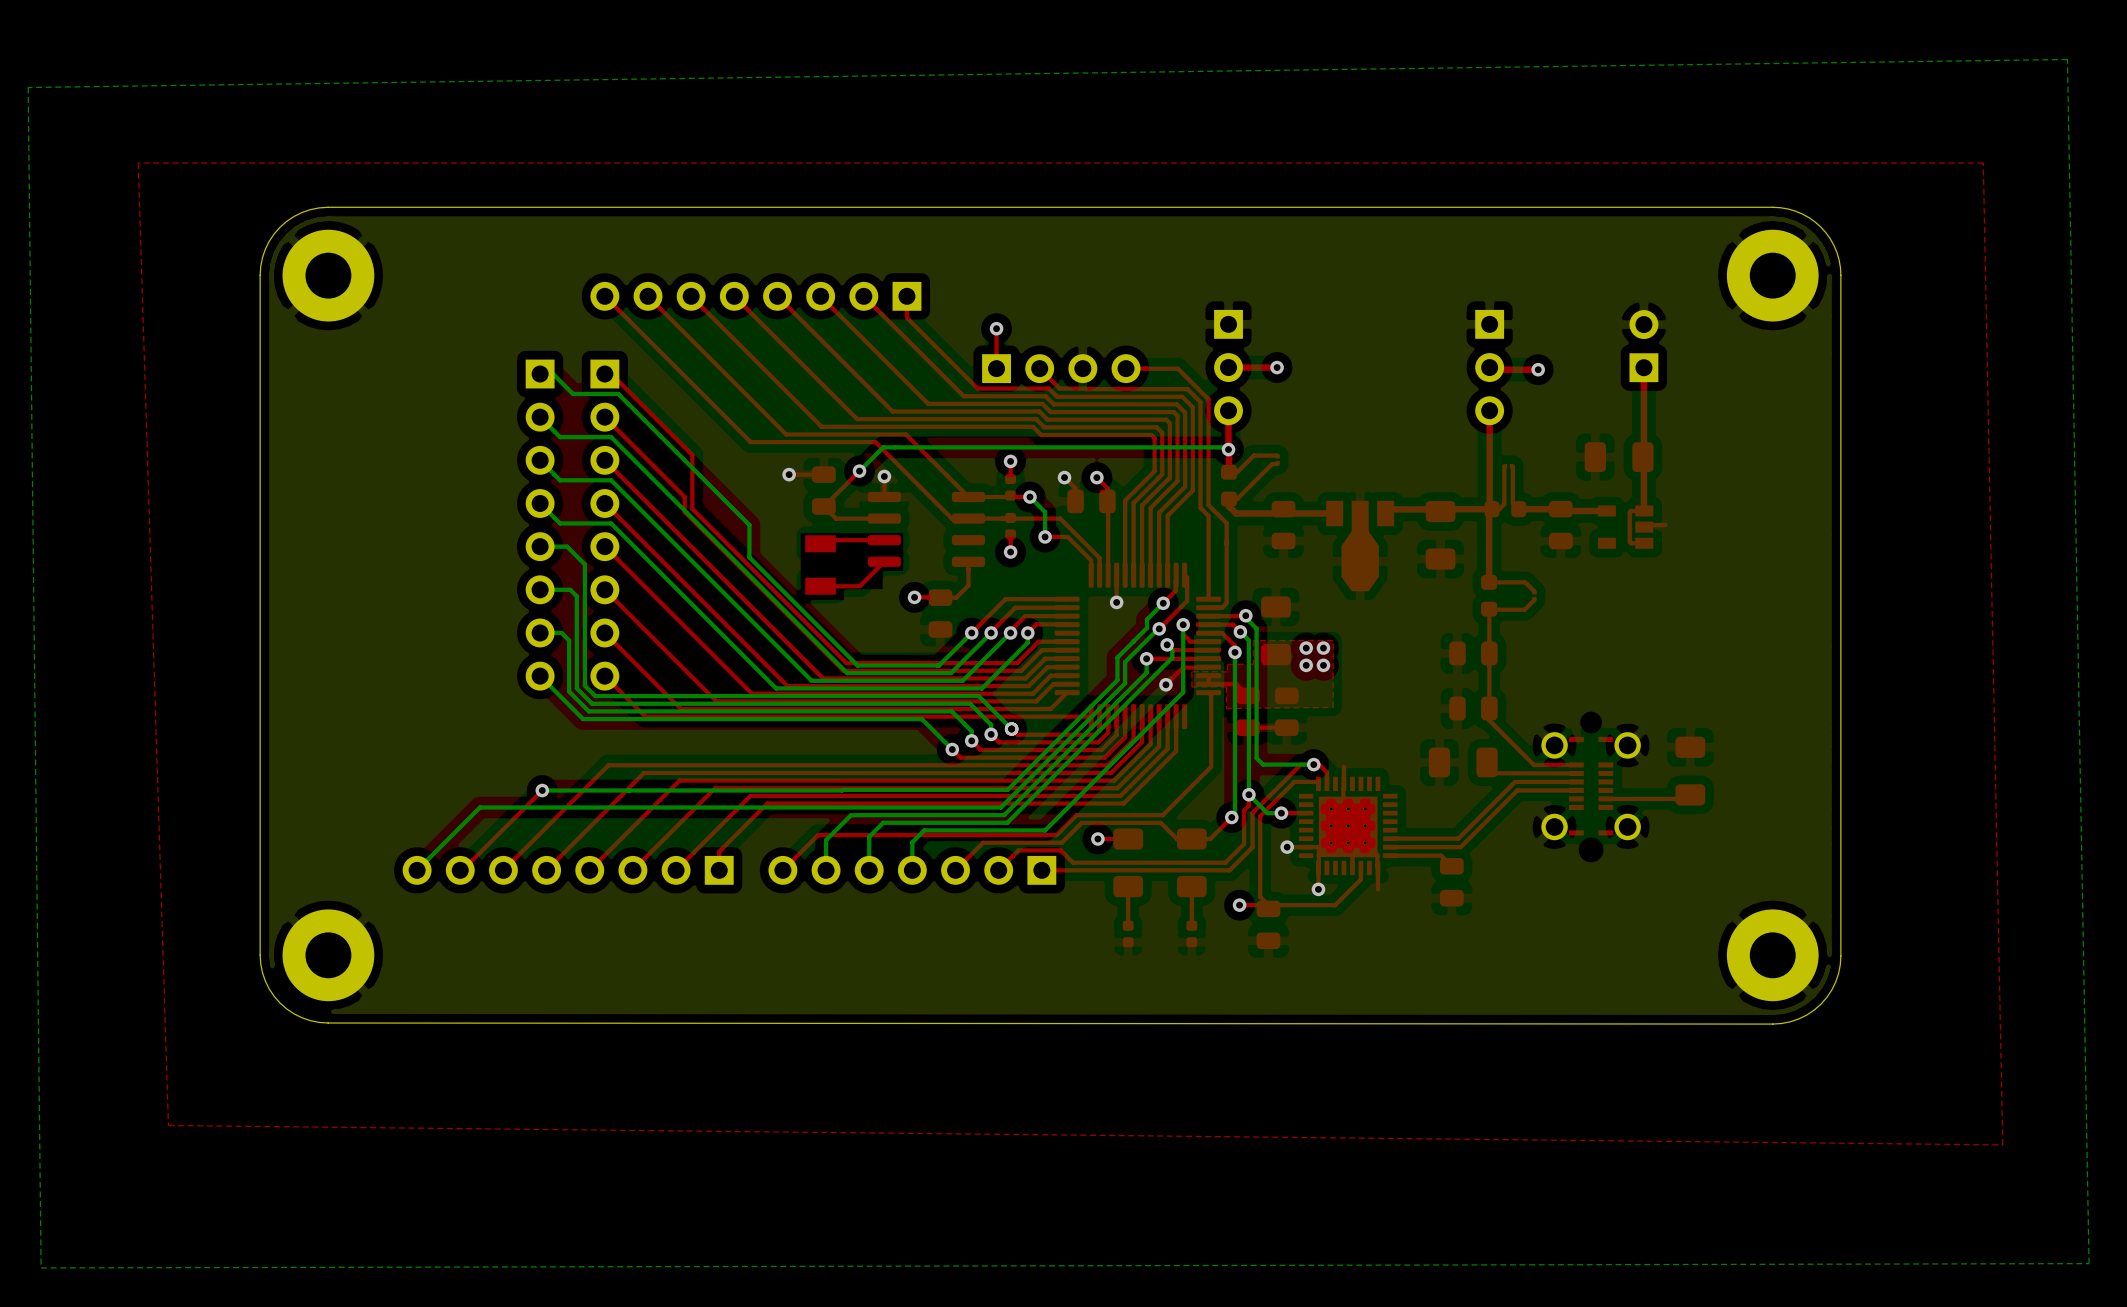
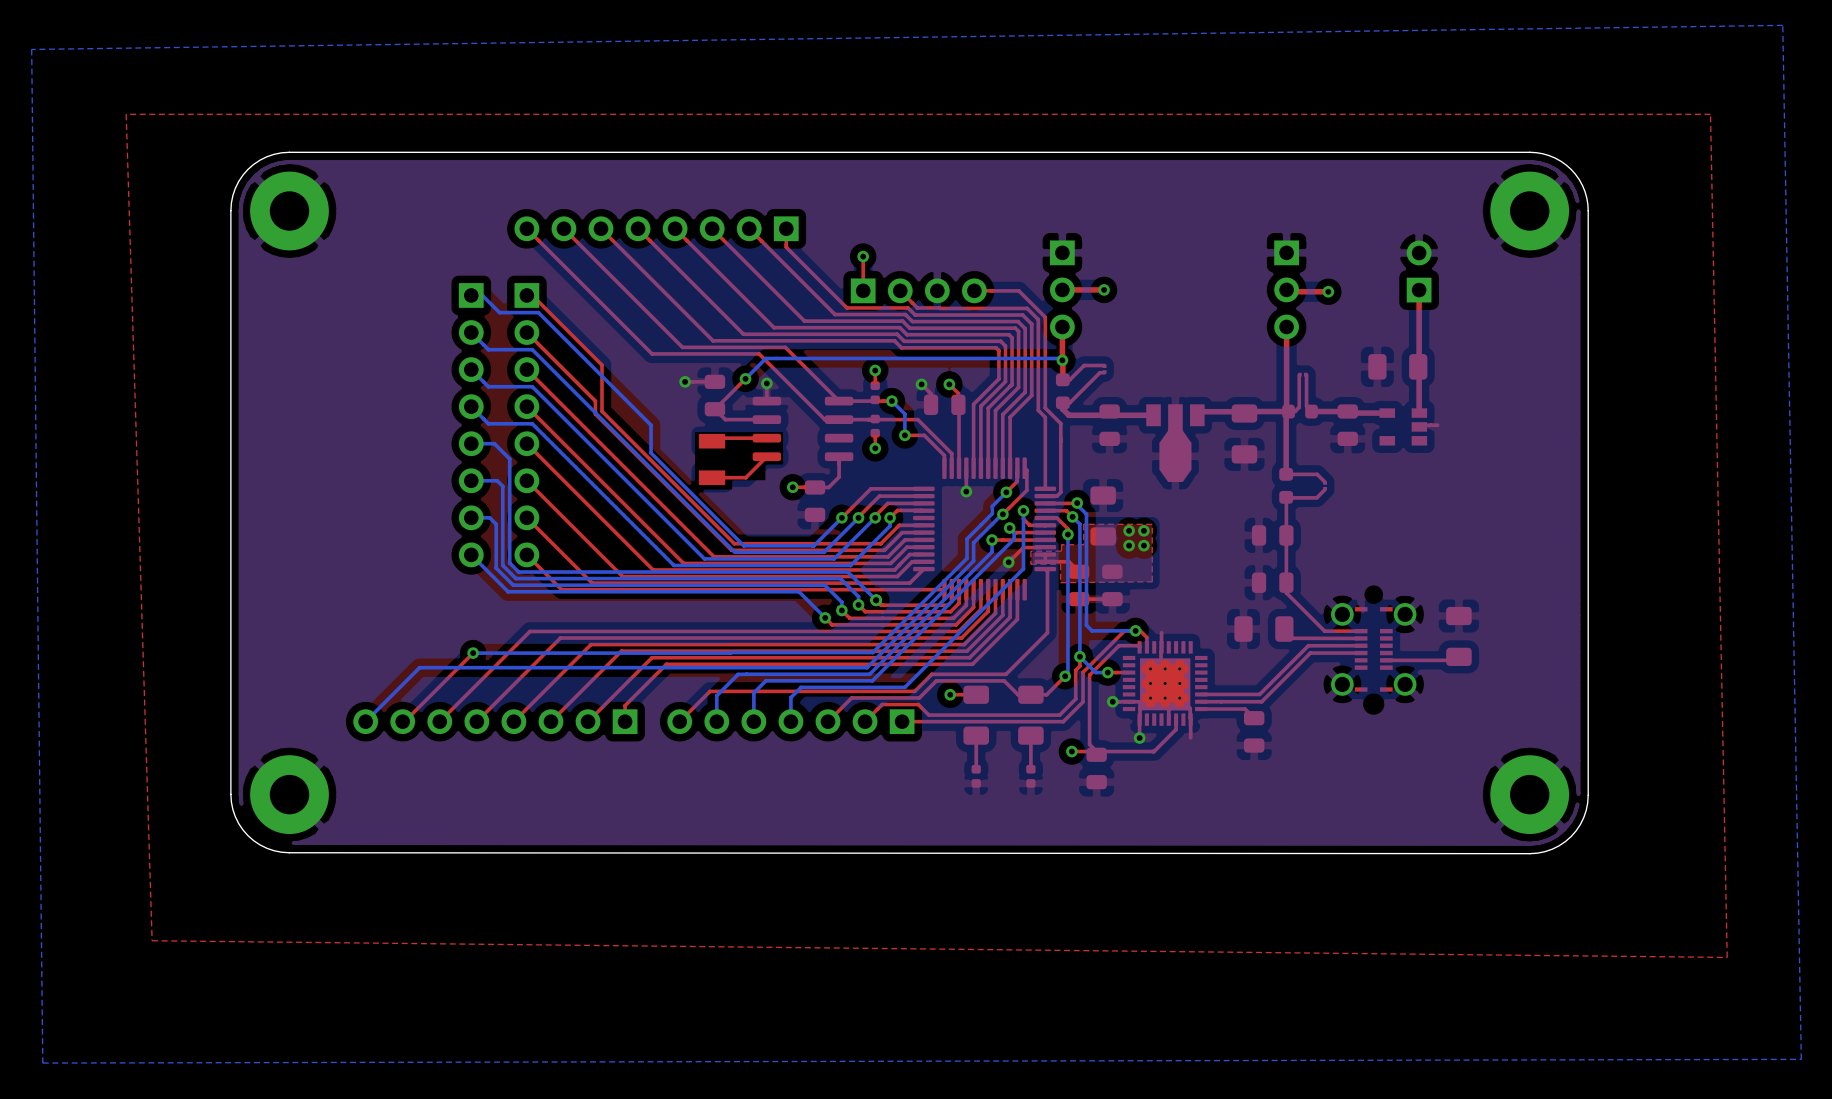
top track: (1644, 510) (1629, 512) (1629, 541) (1644, 543) -> none

